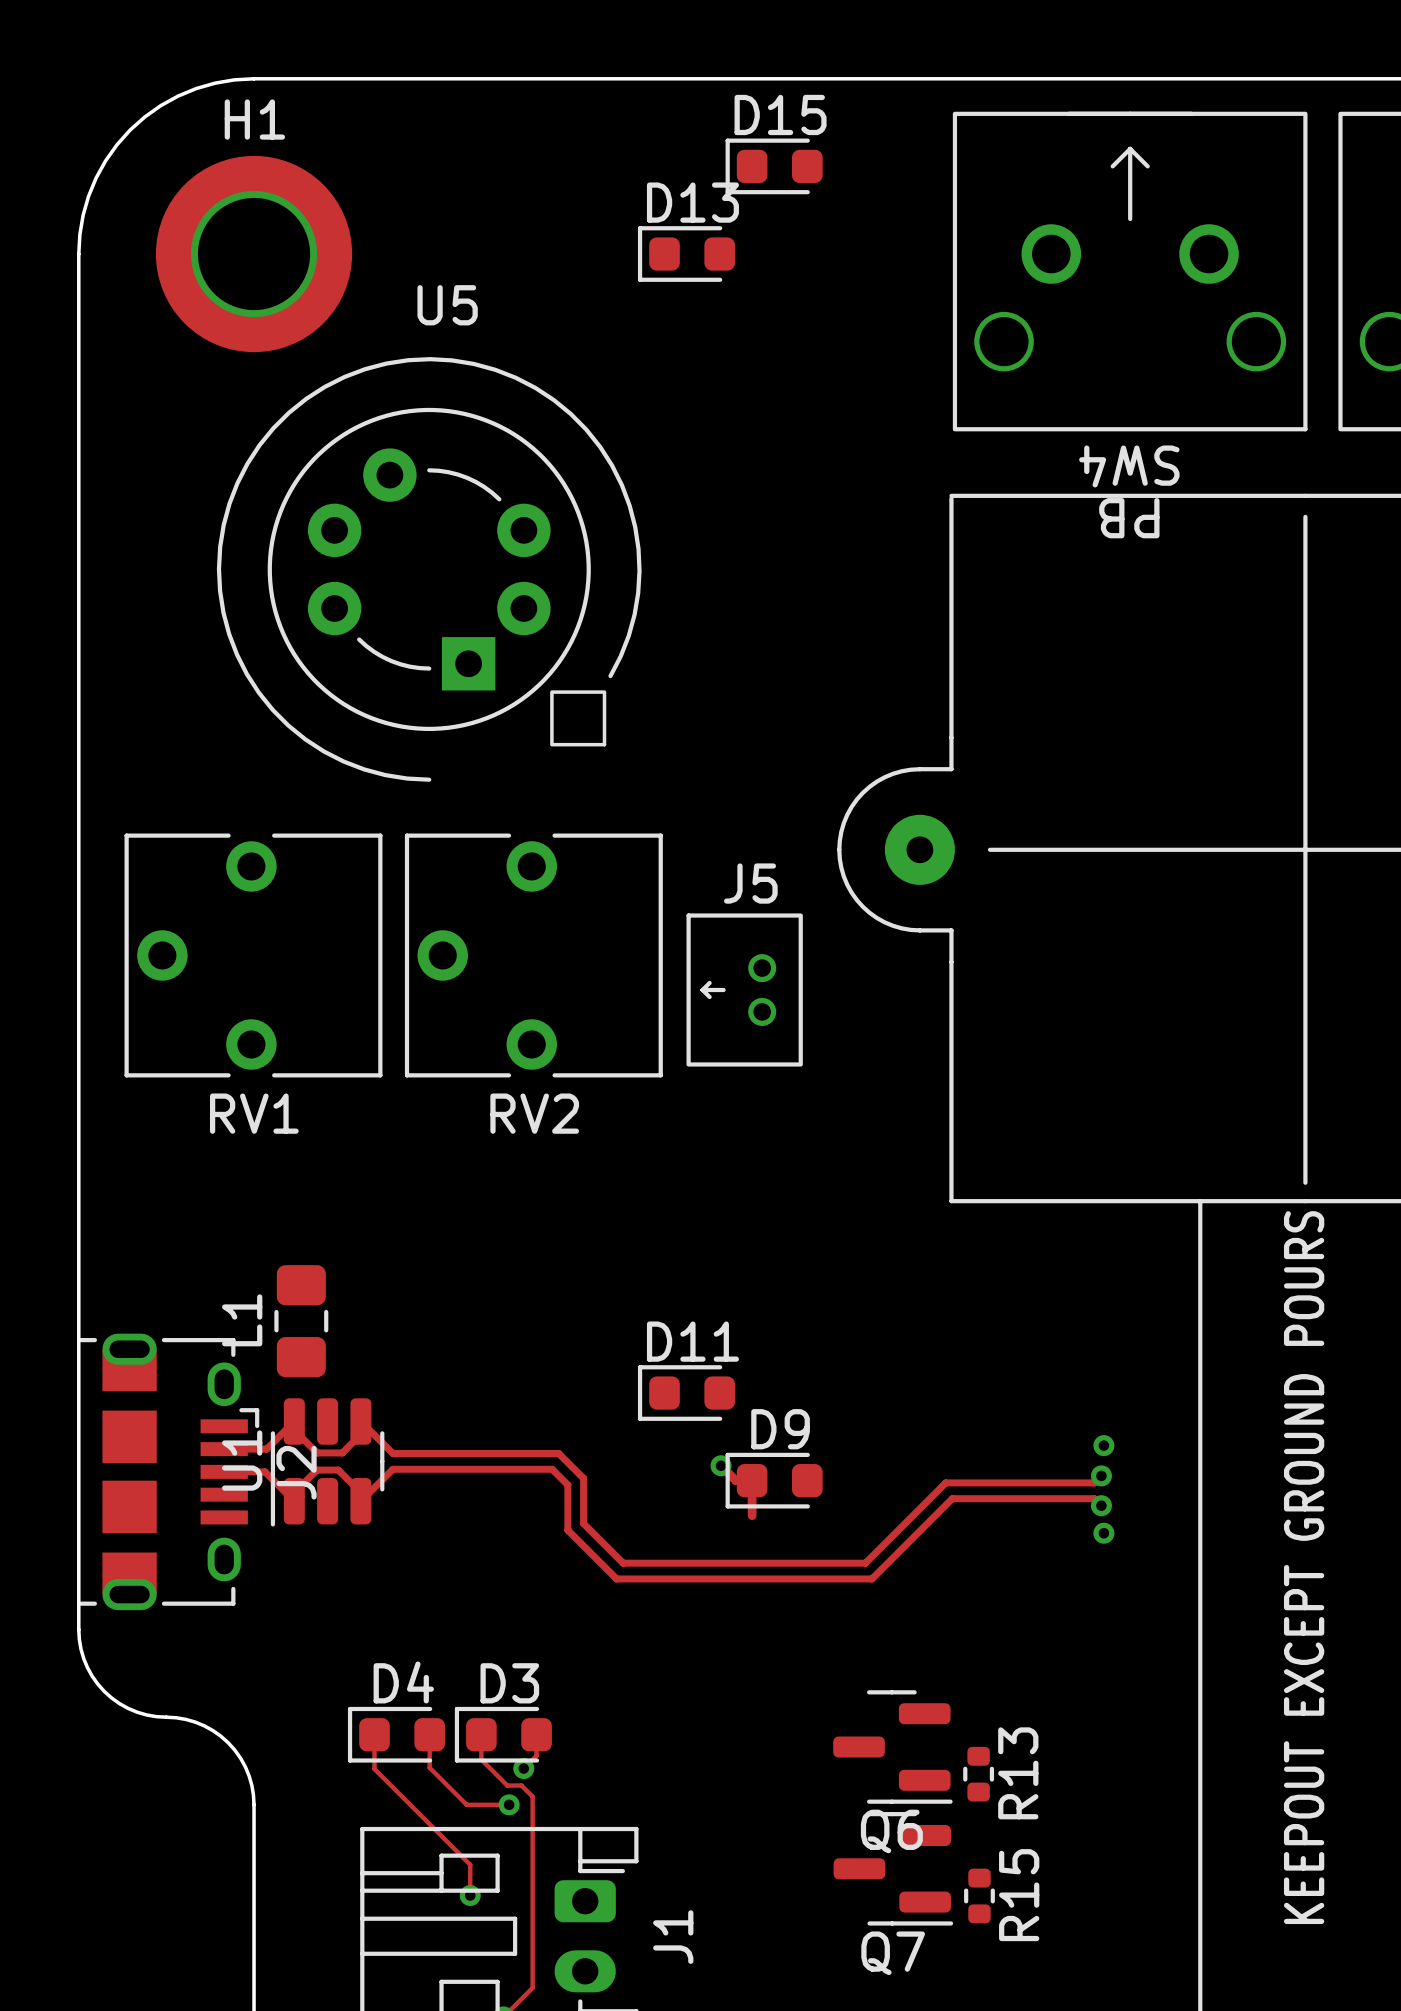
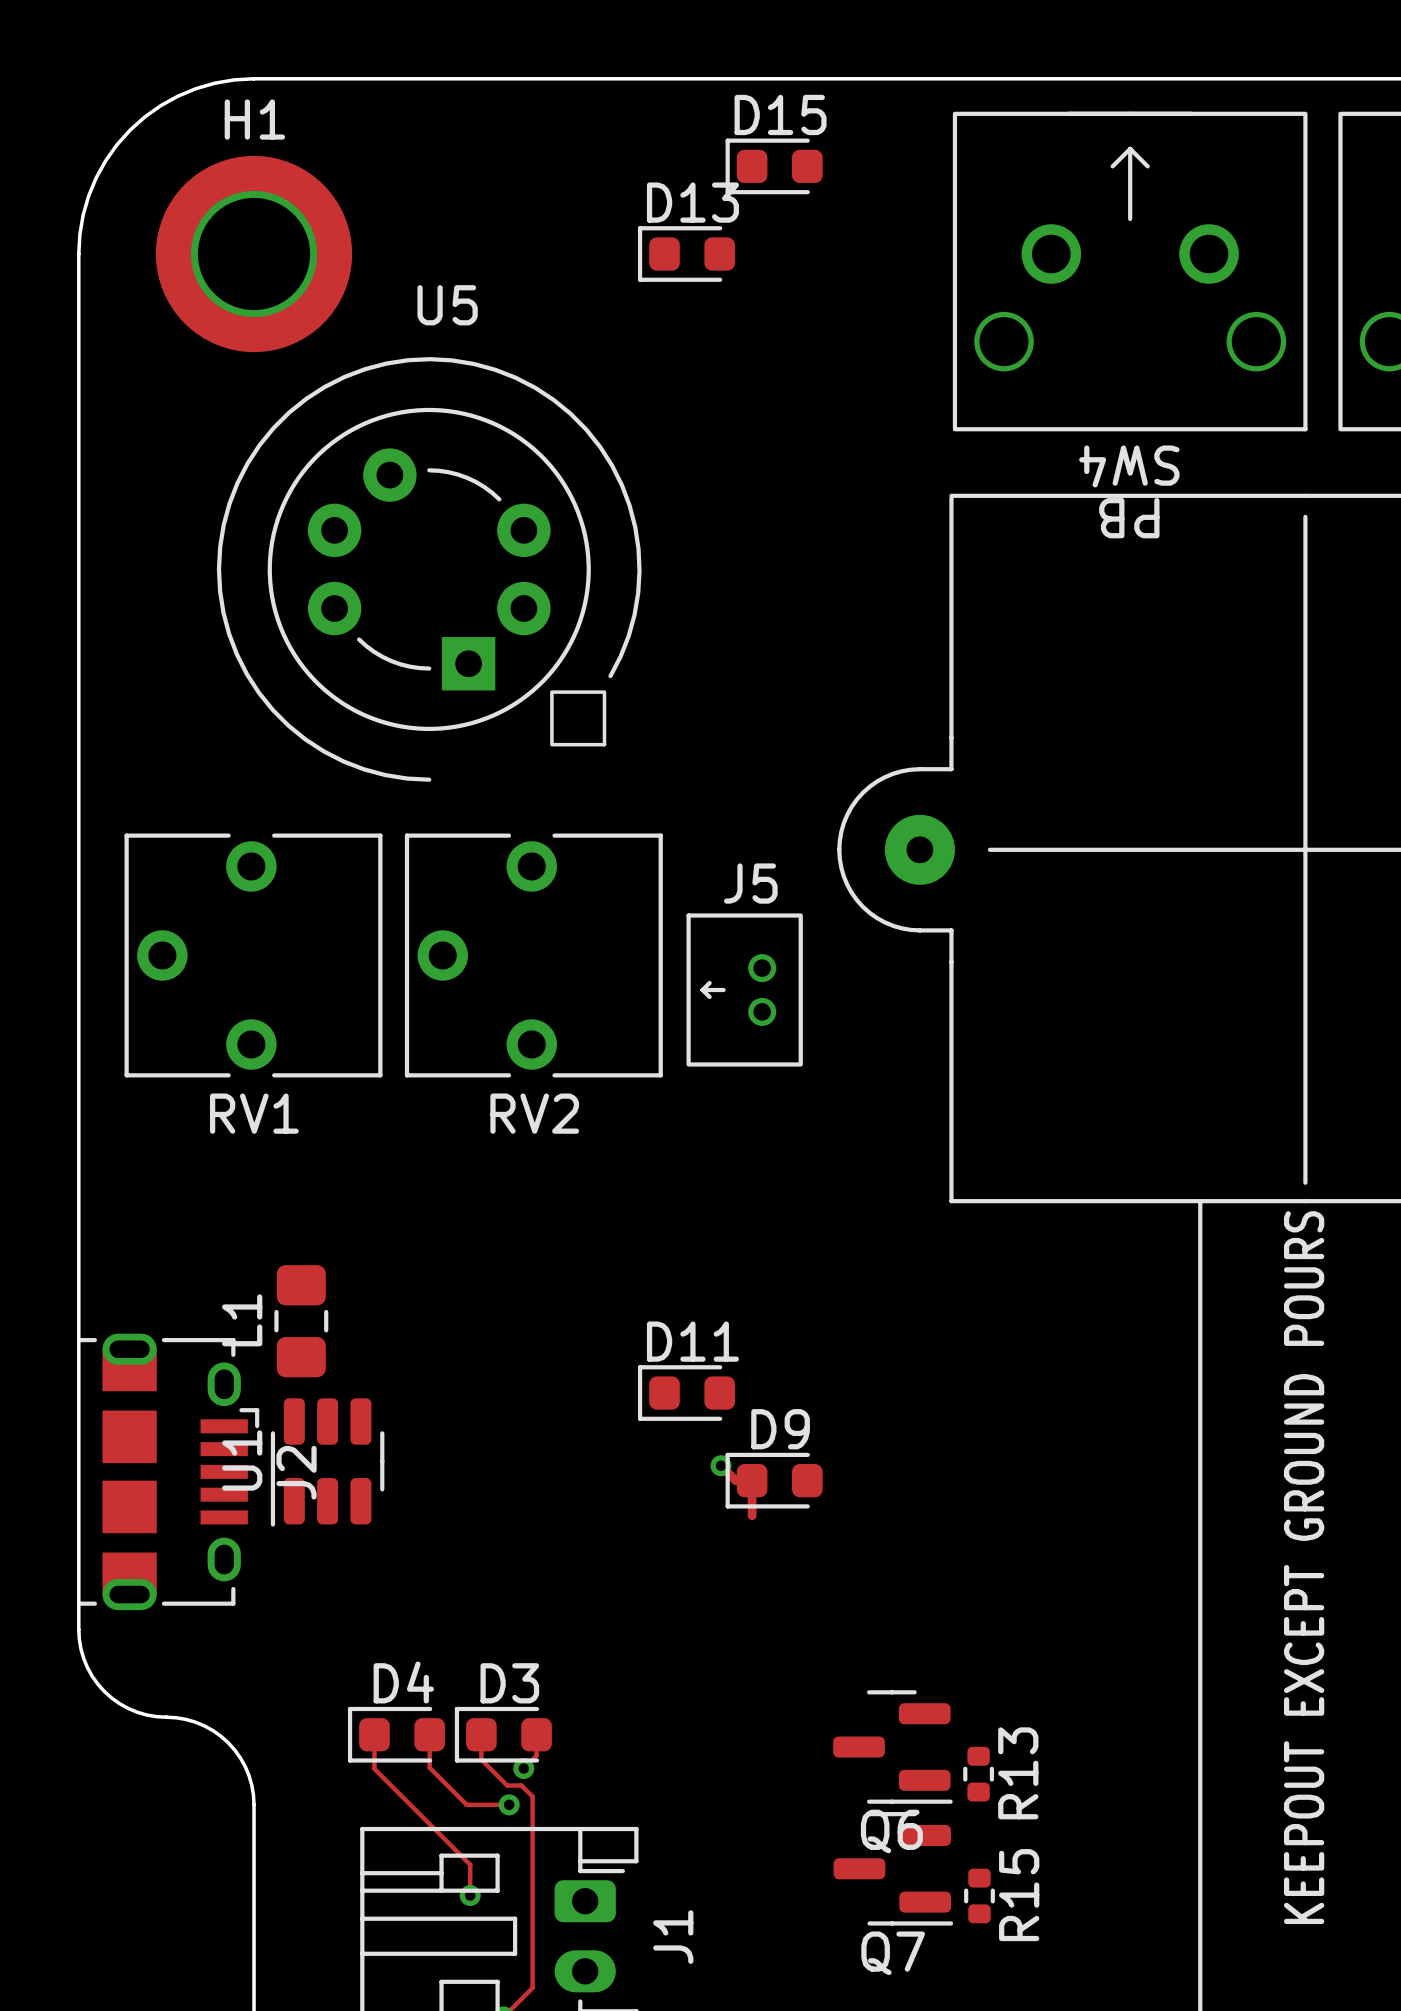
via: (1103, 1445) -> none
track: (224, 1449) (266, 1449) (294, 1421) (294, 1430) (317, 1452) (342, 1452) (360, 1434) (360, 1421) (392, 1453) (558, 1453) (583, 1478) (583, 1523) (623, 1563) (865, 1563) (945, 1482) (1094, 1482) (1101, 1475) -> none
track: (224, 1471) (264, 1471) (294, 1501) (294, 1492) (316, 1470) (338, 1470) (360, 1492) (360, 1501) (392, 1469) (552, 1469) (567, 1484) (567, 1530) (616, 1578) (872, 1578) (952, 1498) (1094, 1498) (1101, 1505) -> none
via: (1101, 1475) -> none
via: (1101, 1505) -> none
via: (1103, 1533) -> none

